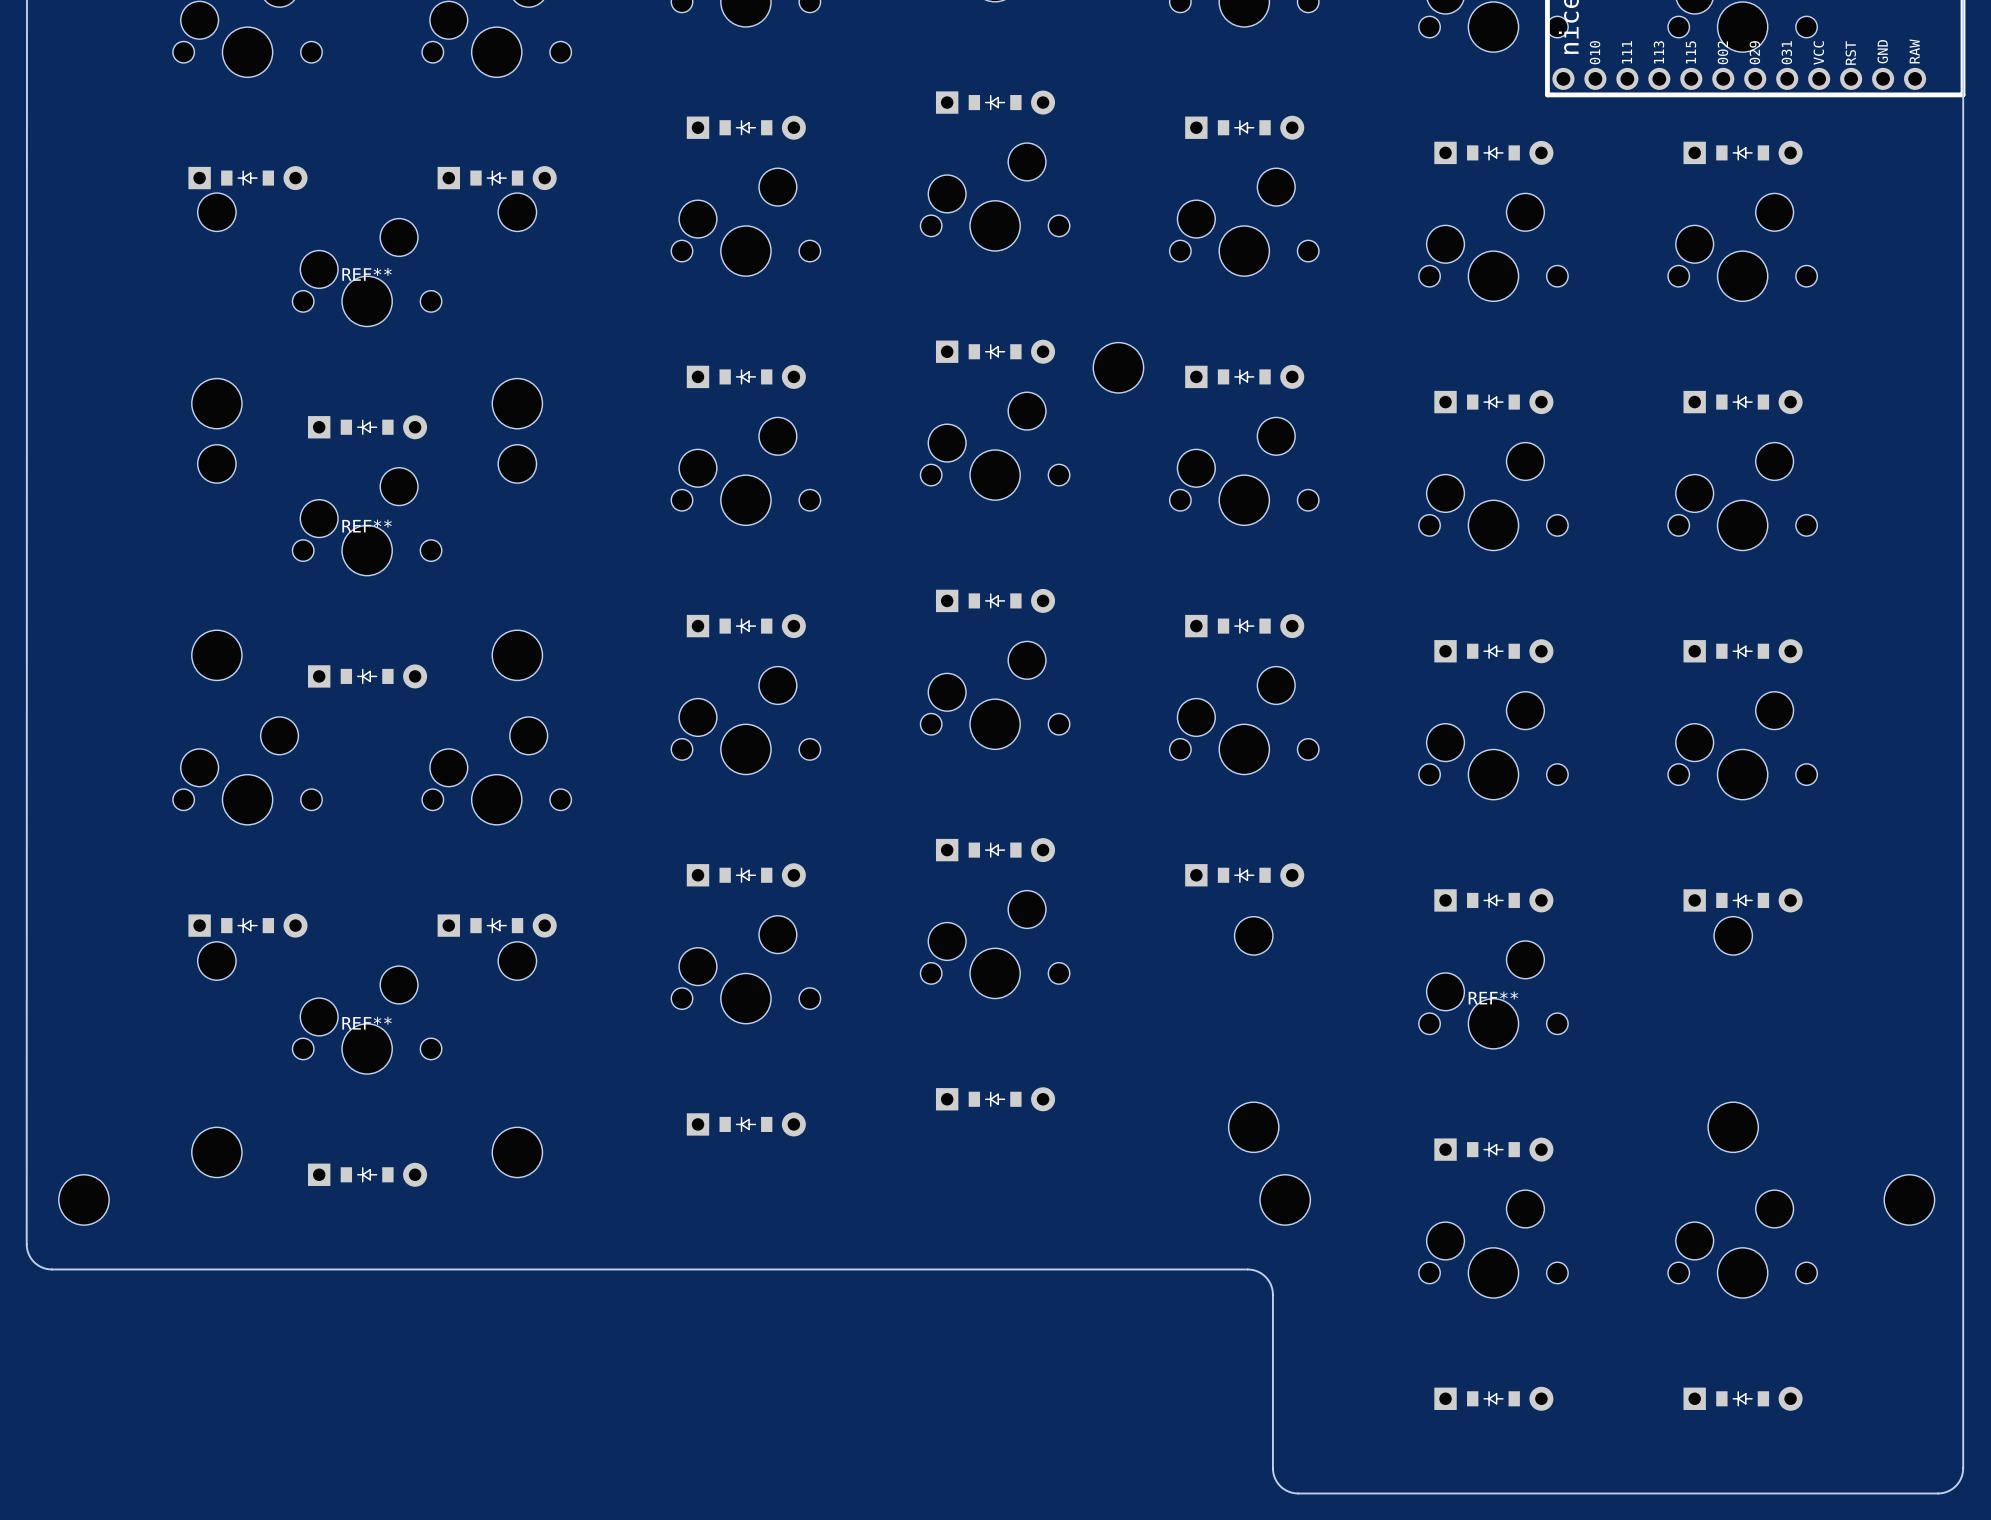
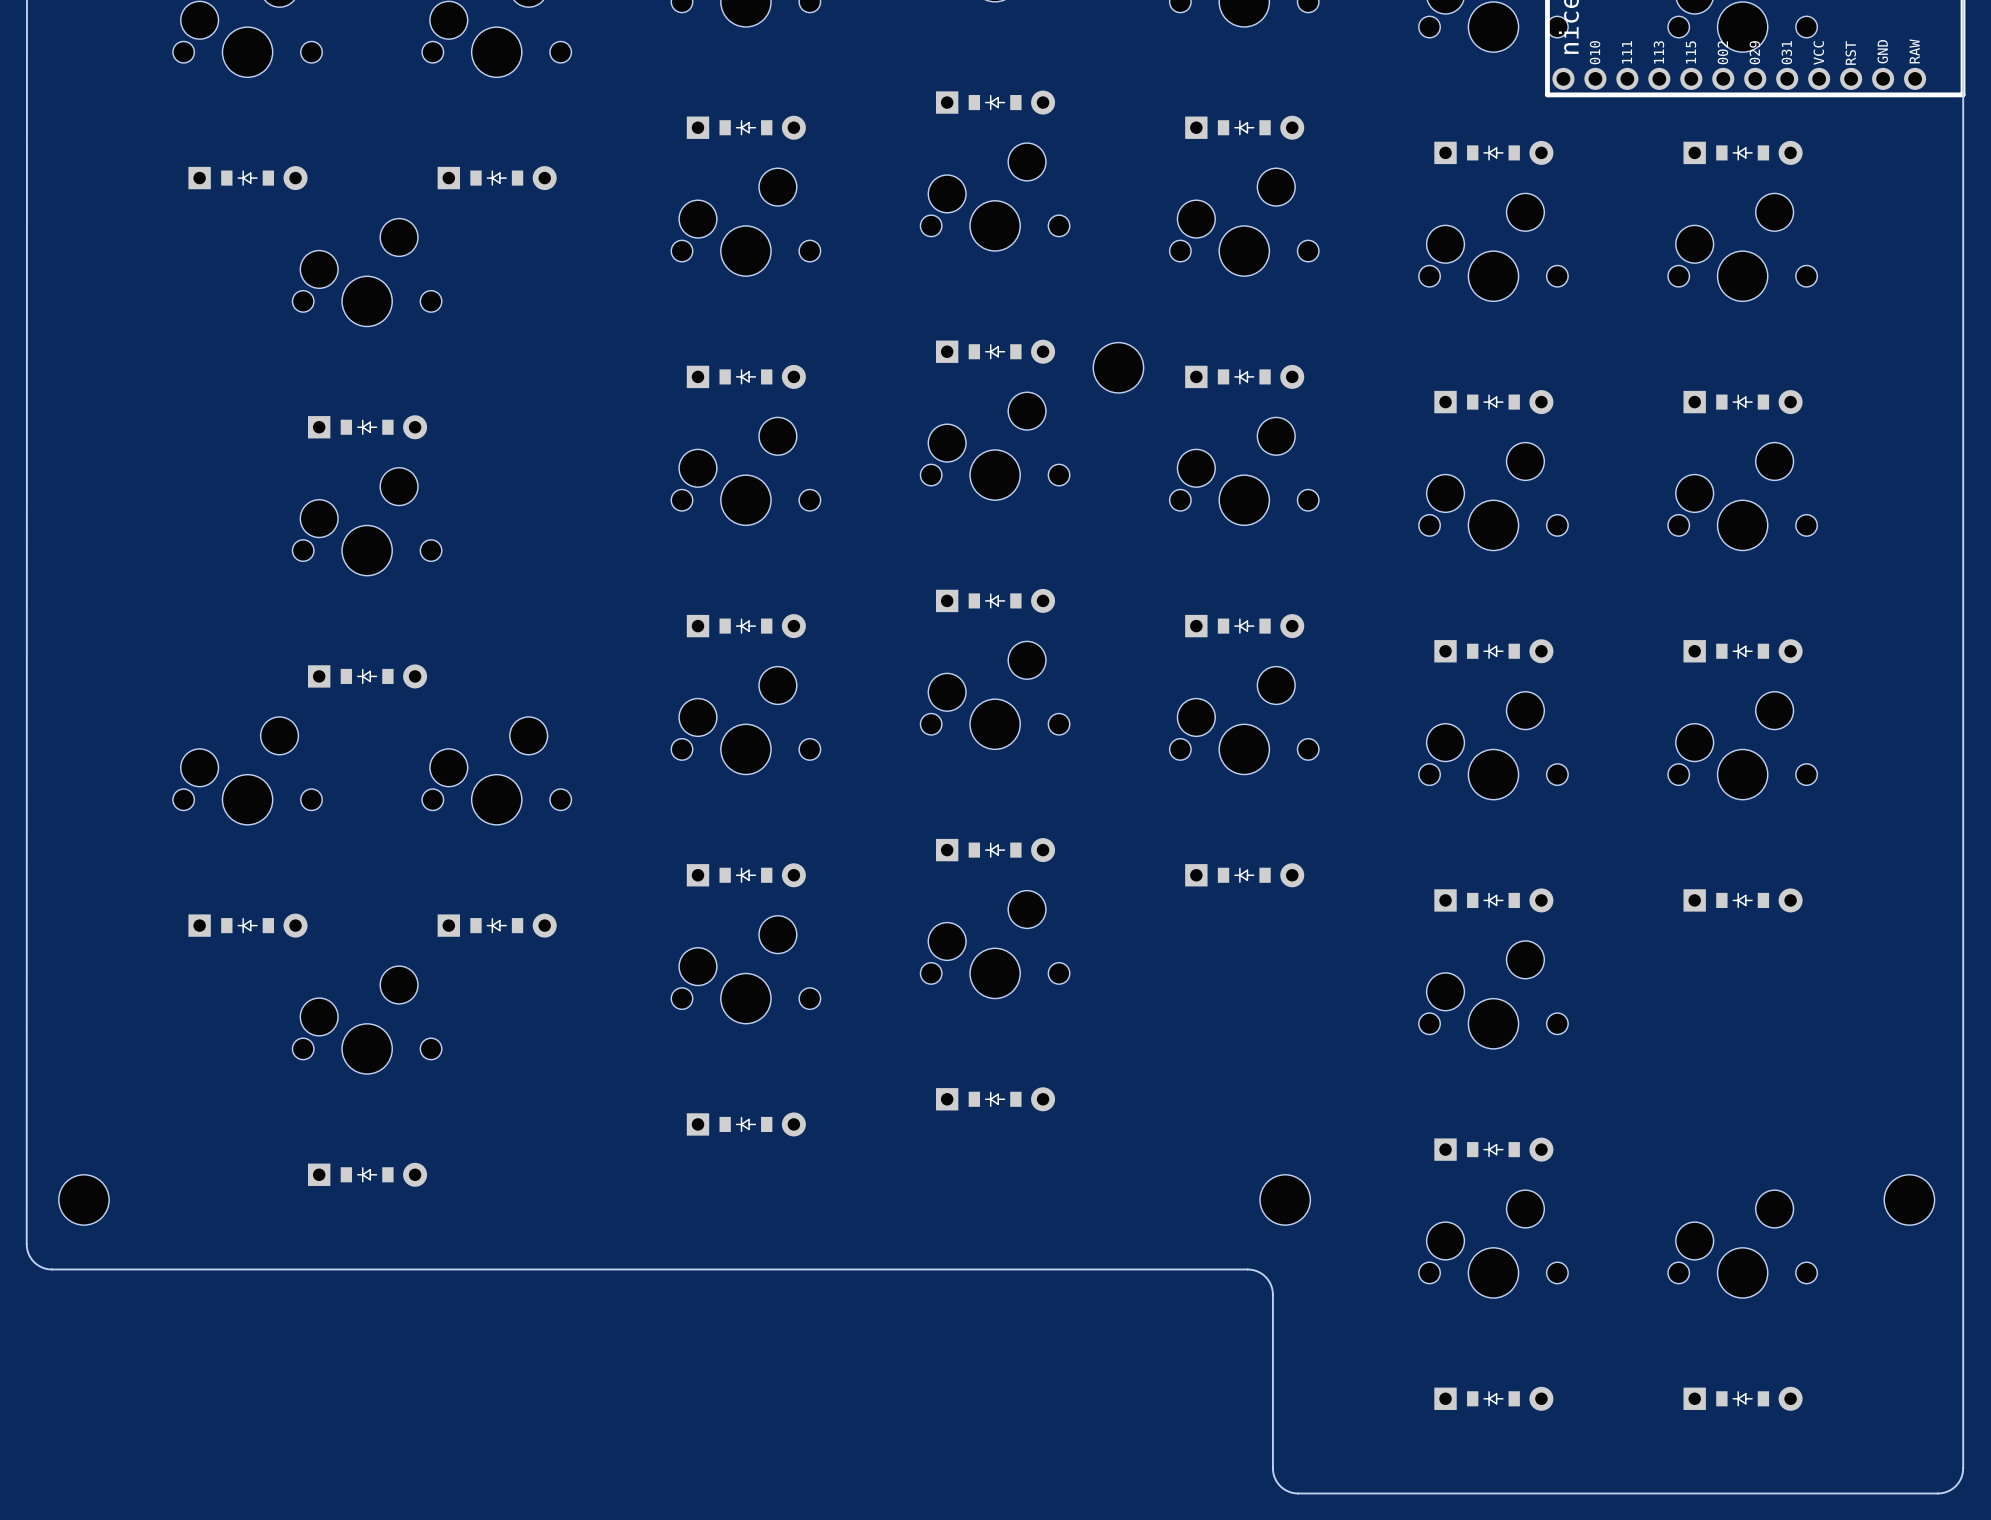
REF**: (367, 310) -> none
REF**: (367, 562) -> none
REF**: (1493, 1034) -> none
REF**: (367, 1059) -> none

